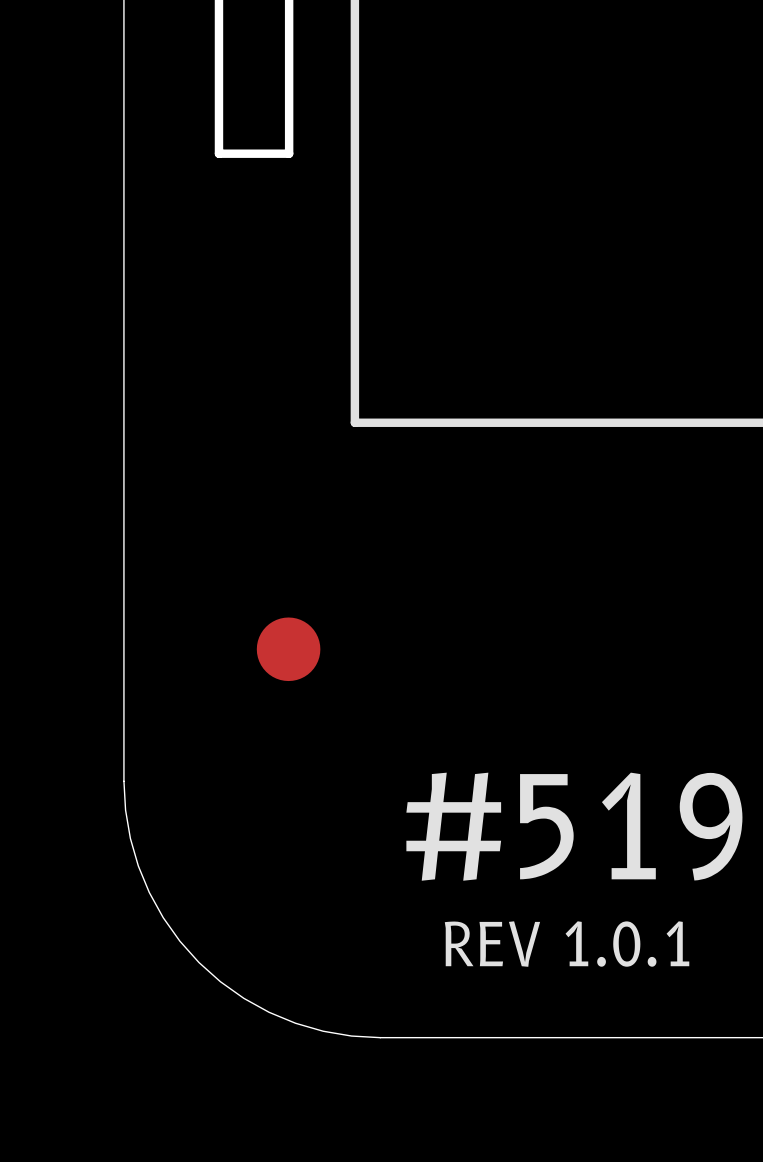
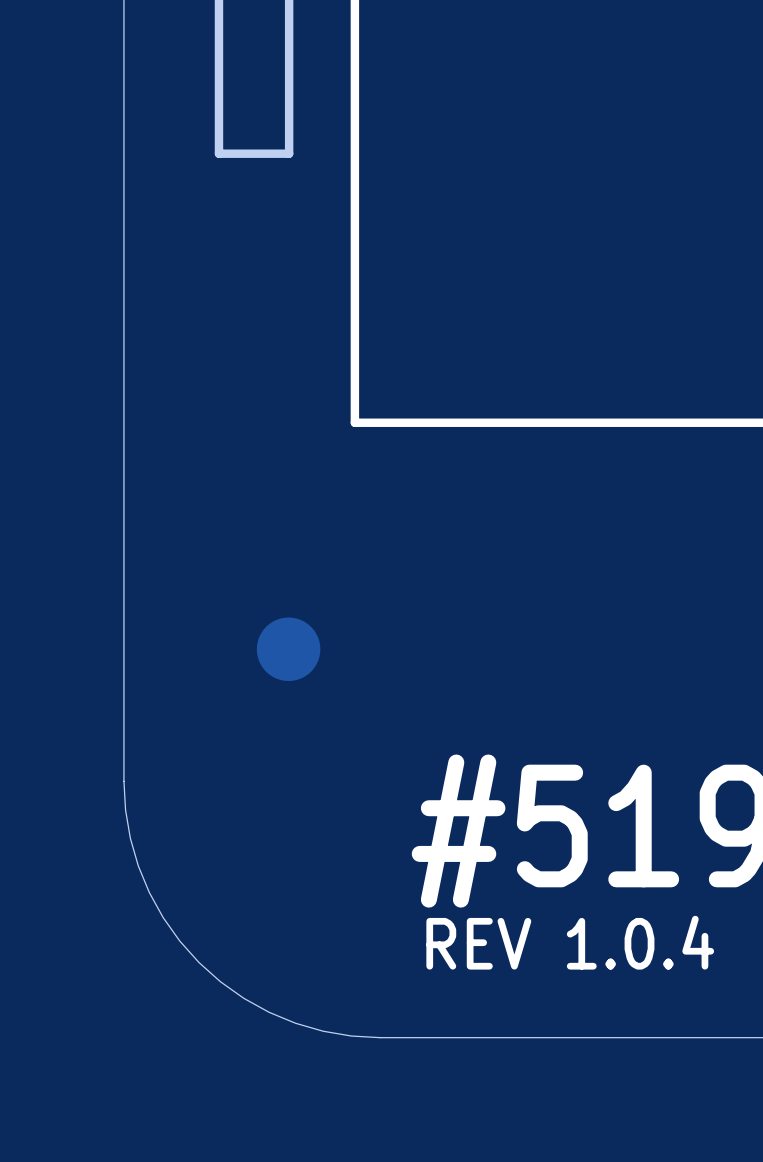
text: REV 1.0.1 (567, 944) -> REV 1.0.4 (570, 942)

